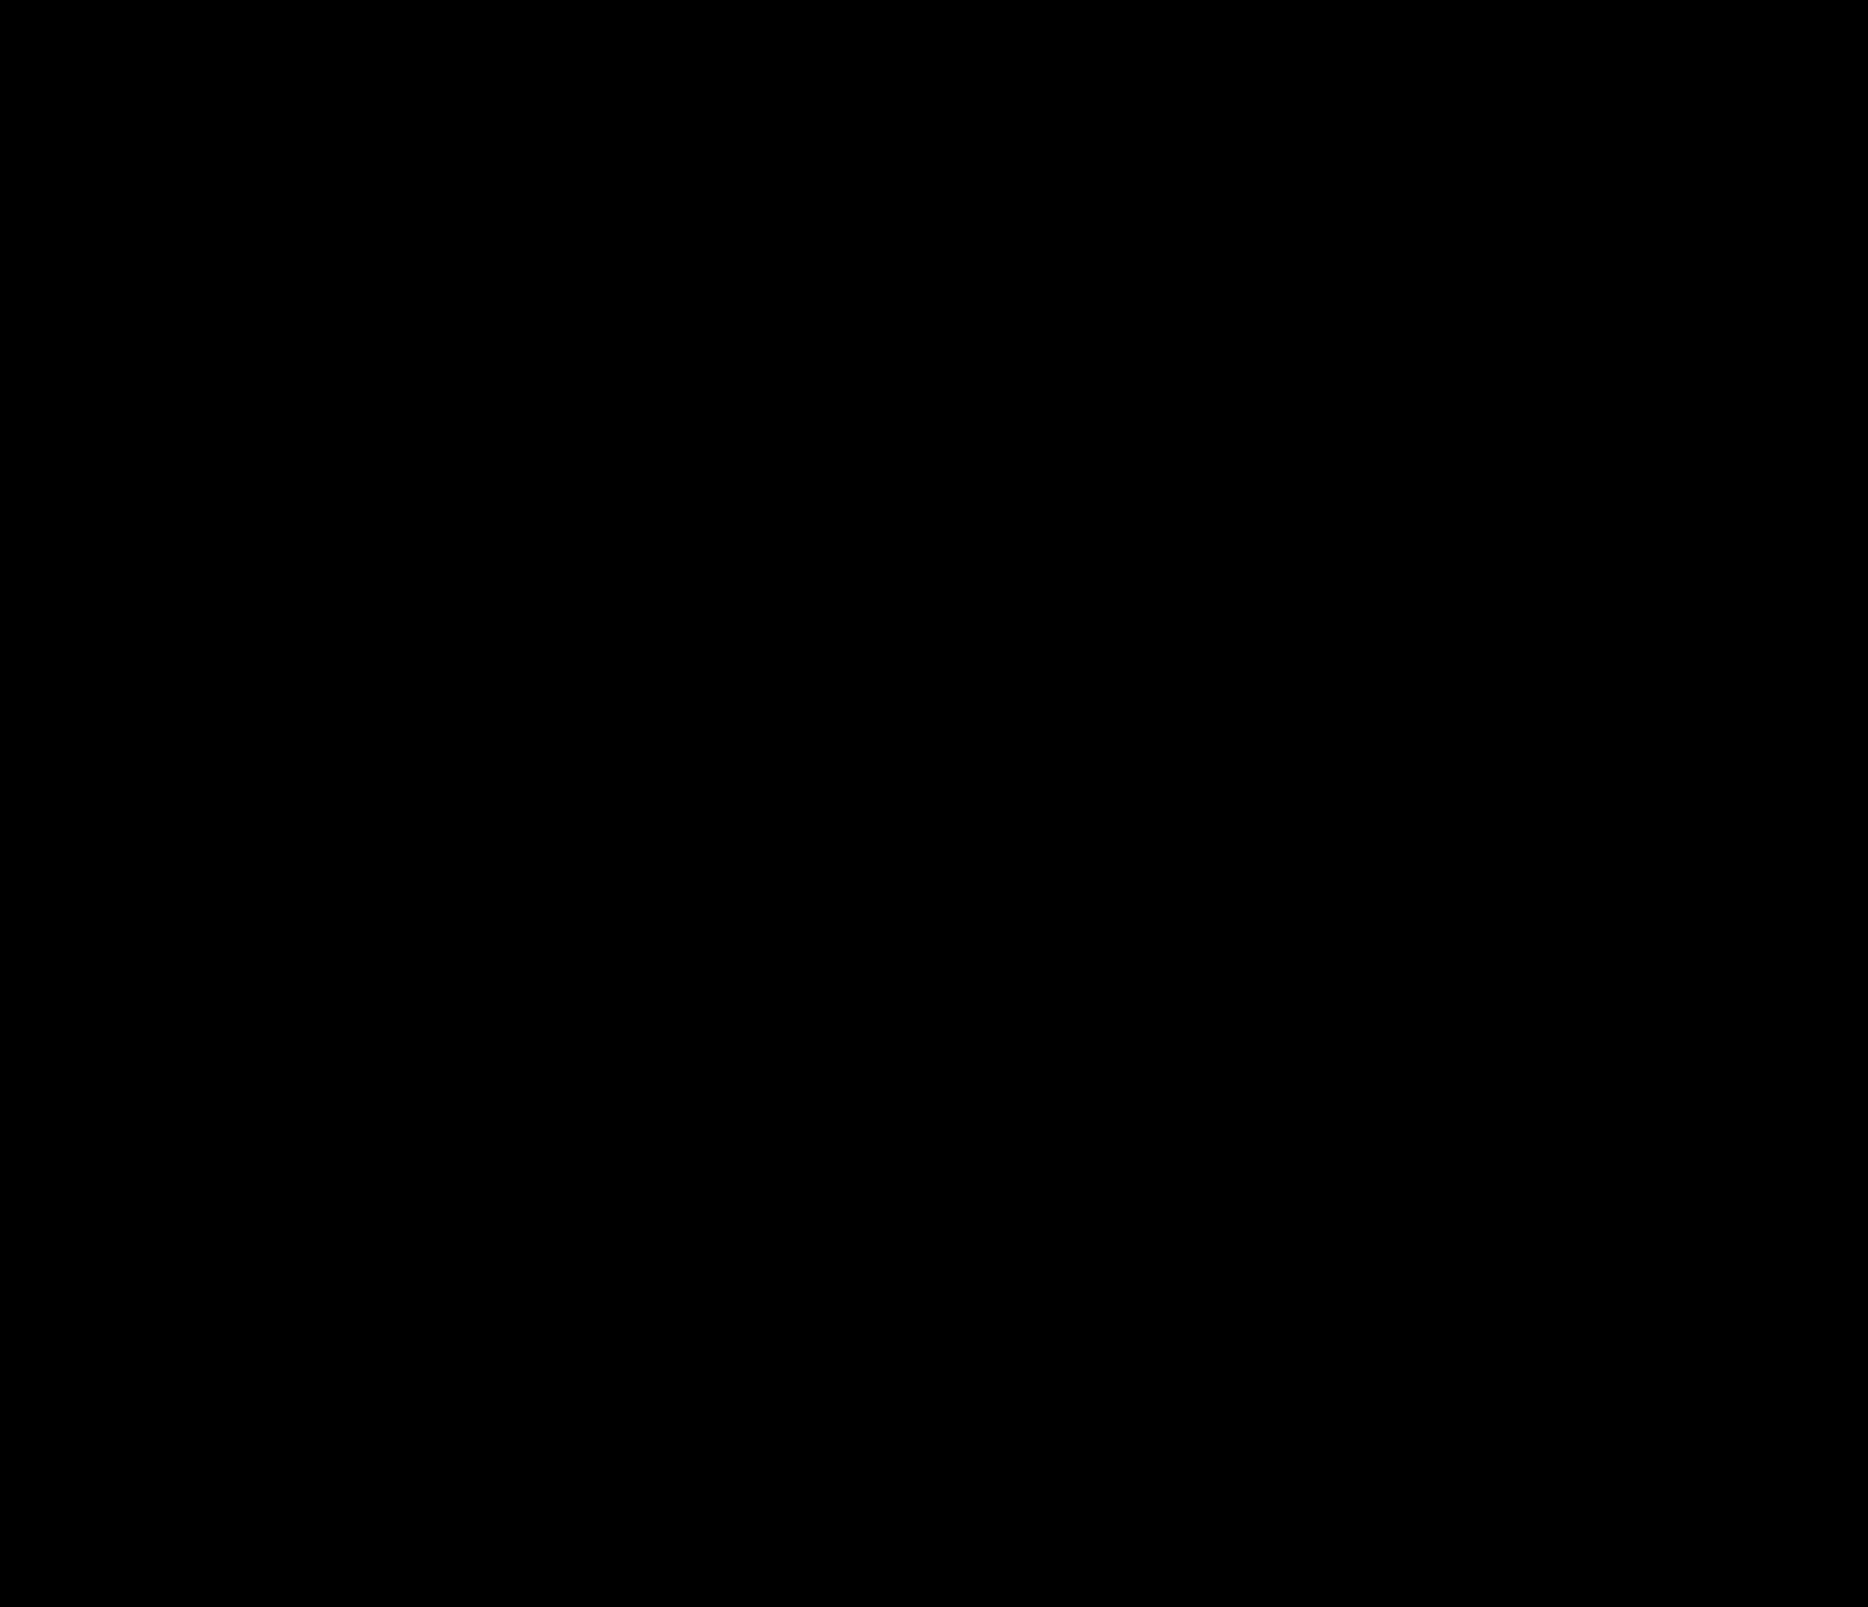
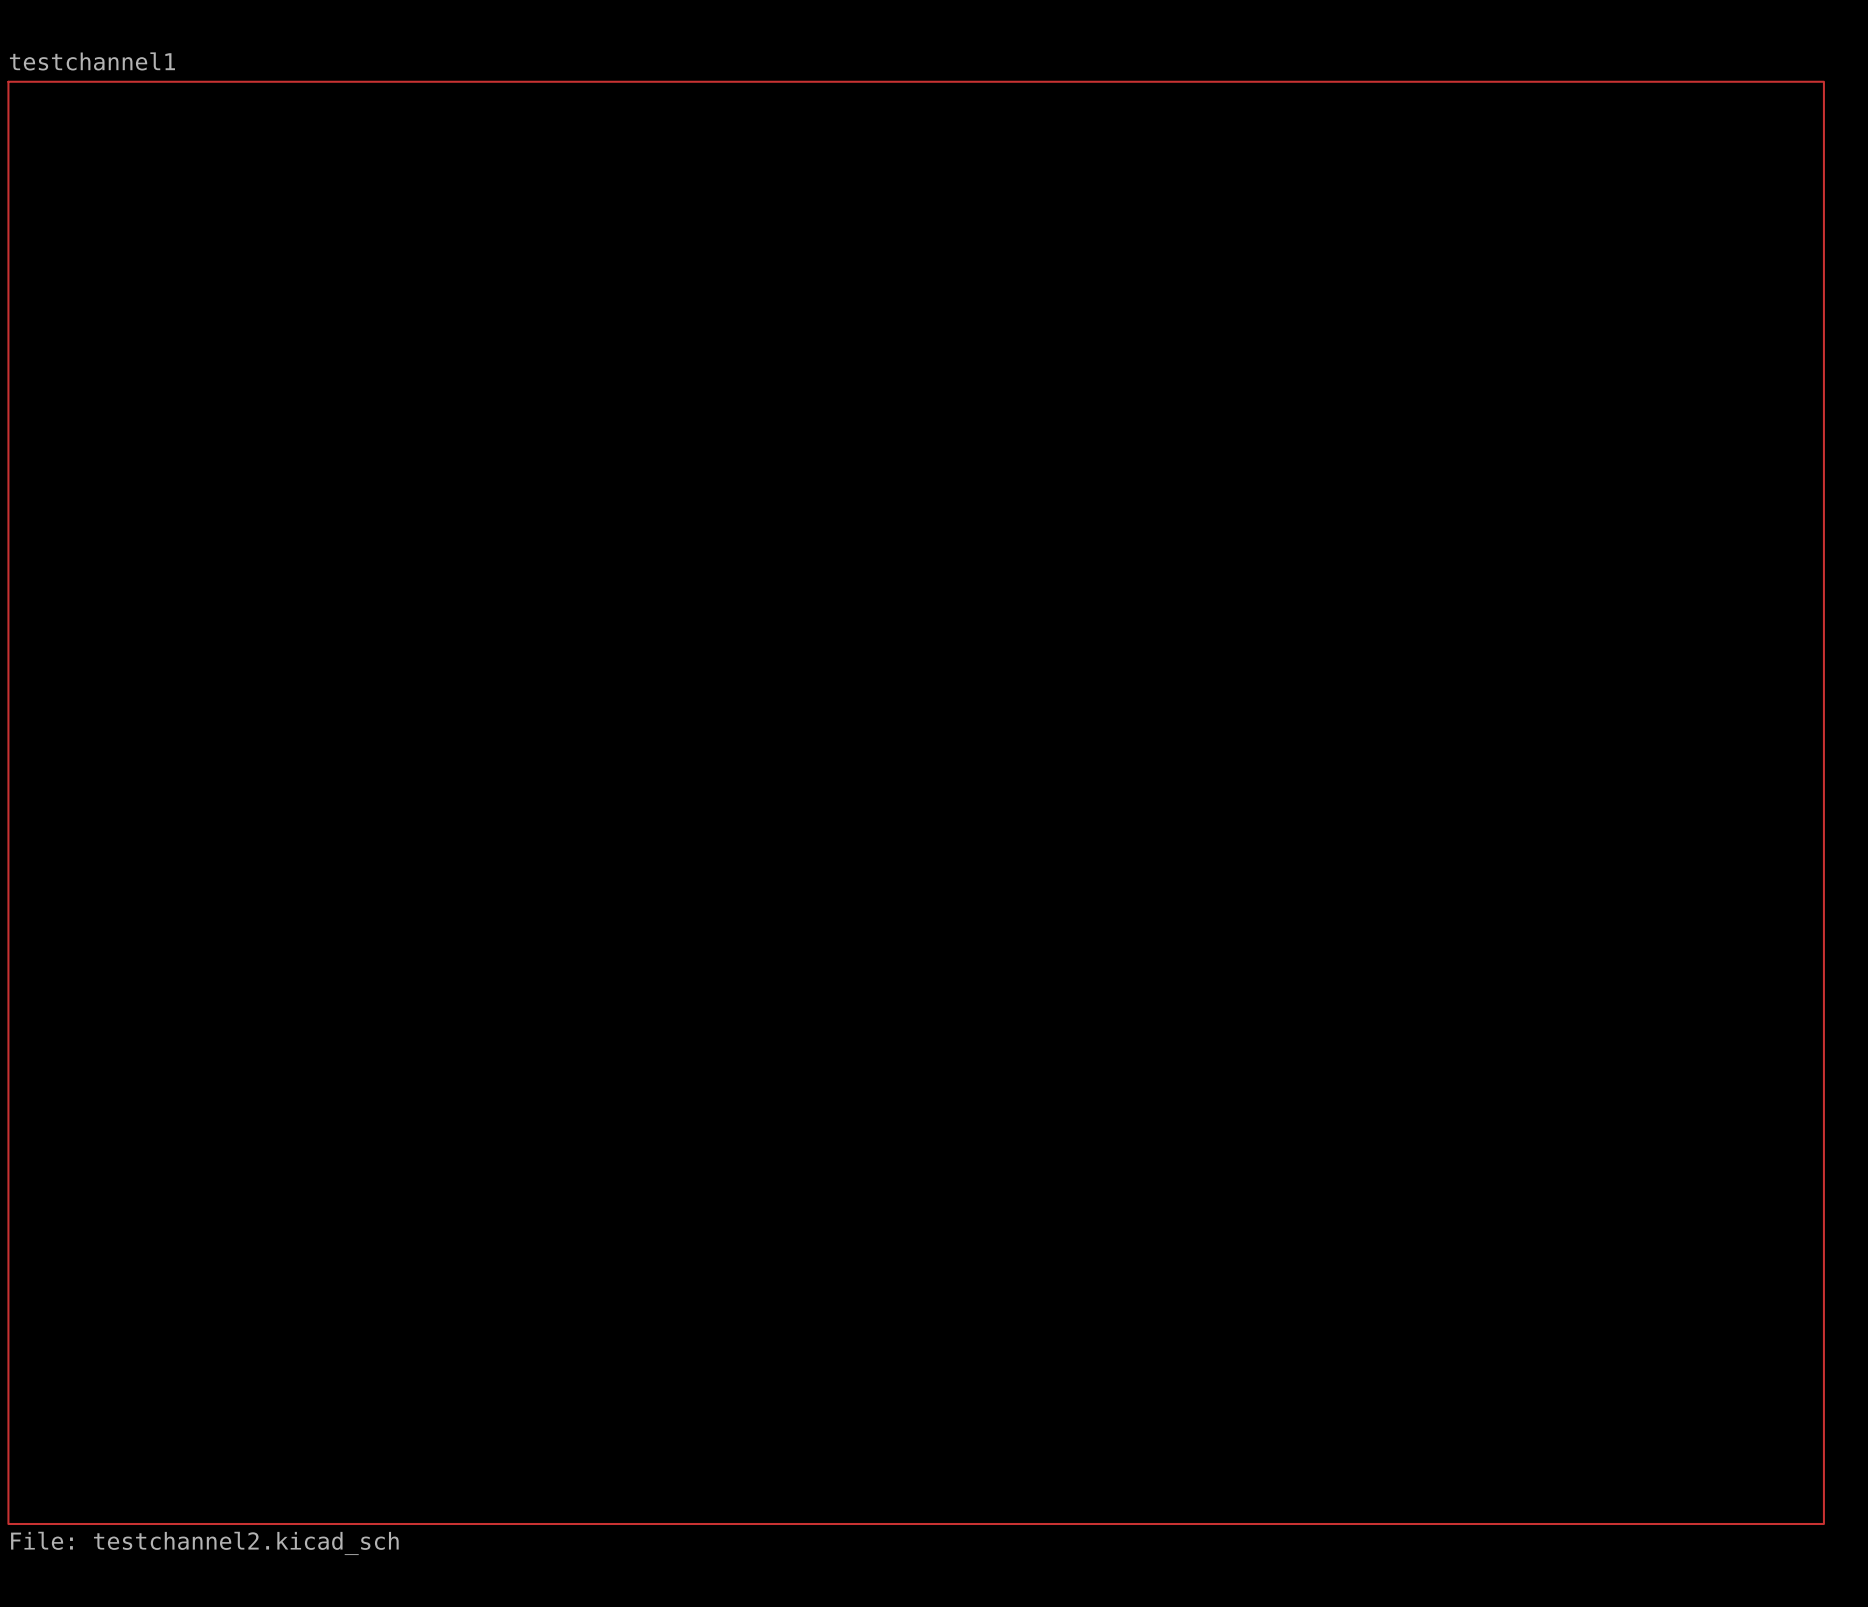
sheet testchannel1: none -> File: testchannel2.kicad_sch (916, 802)

